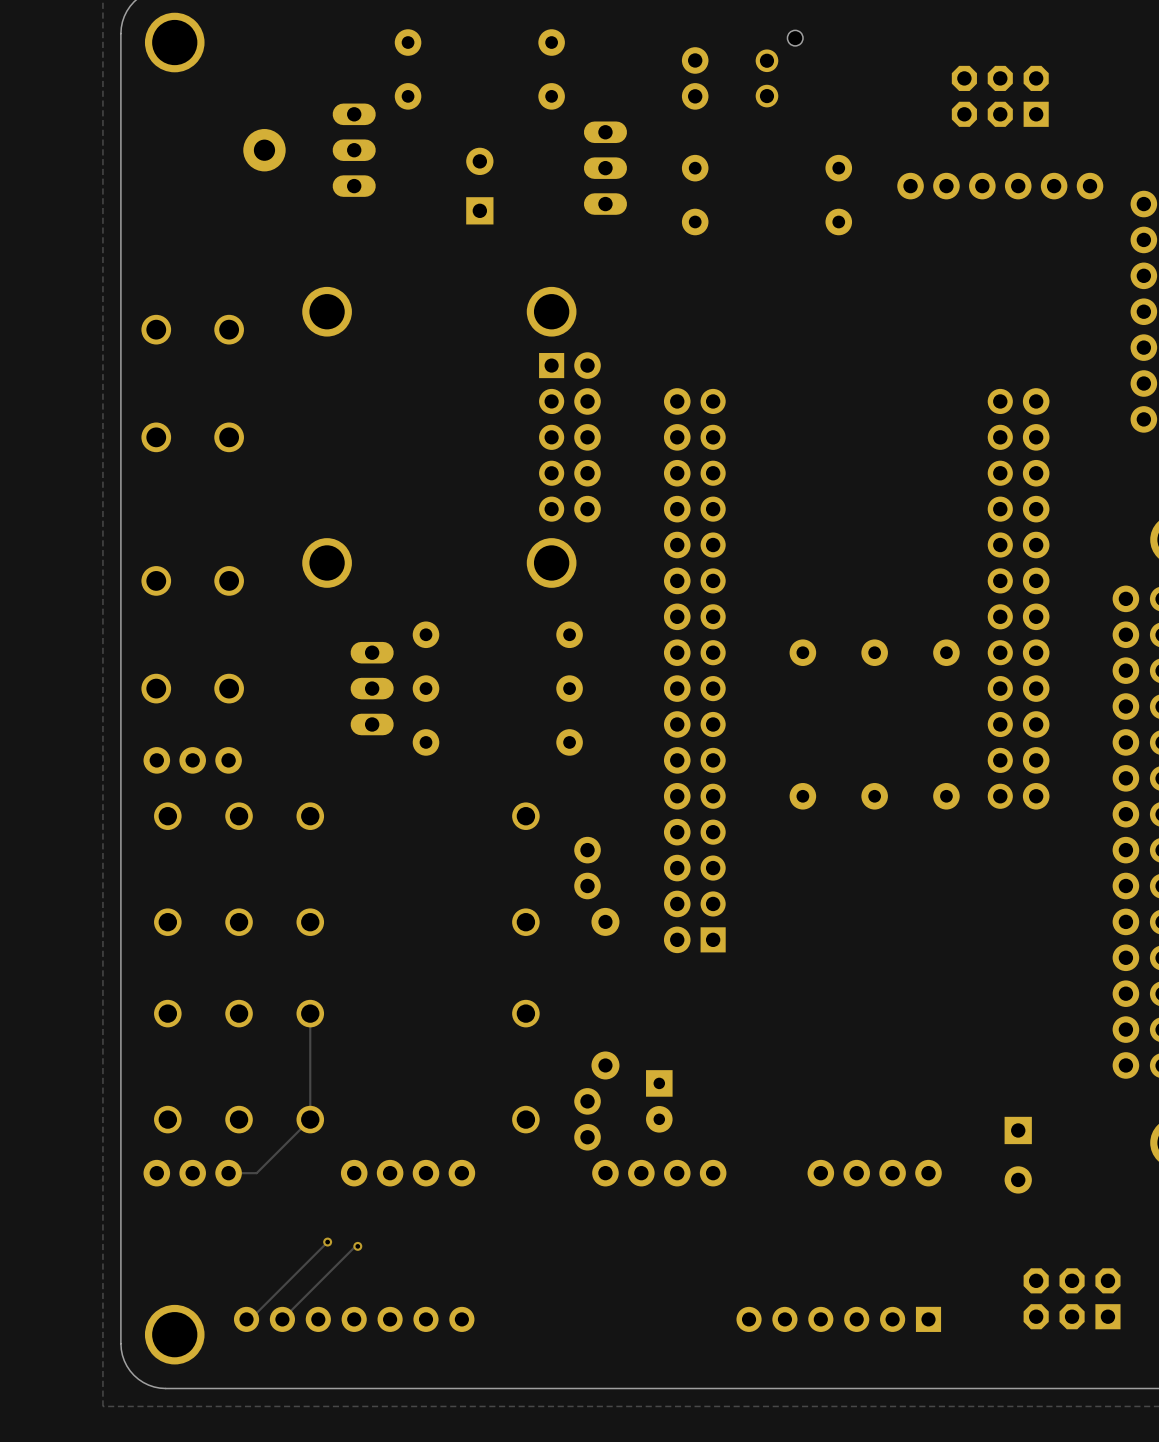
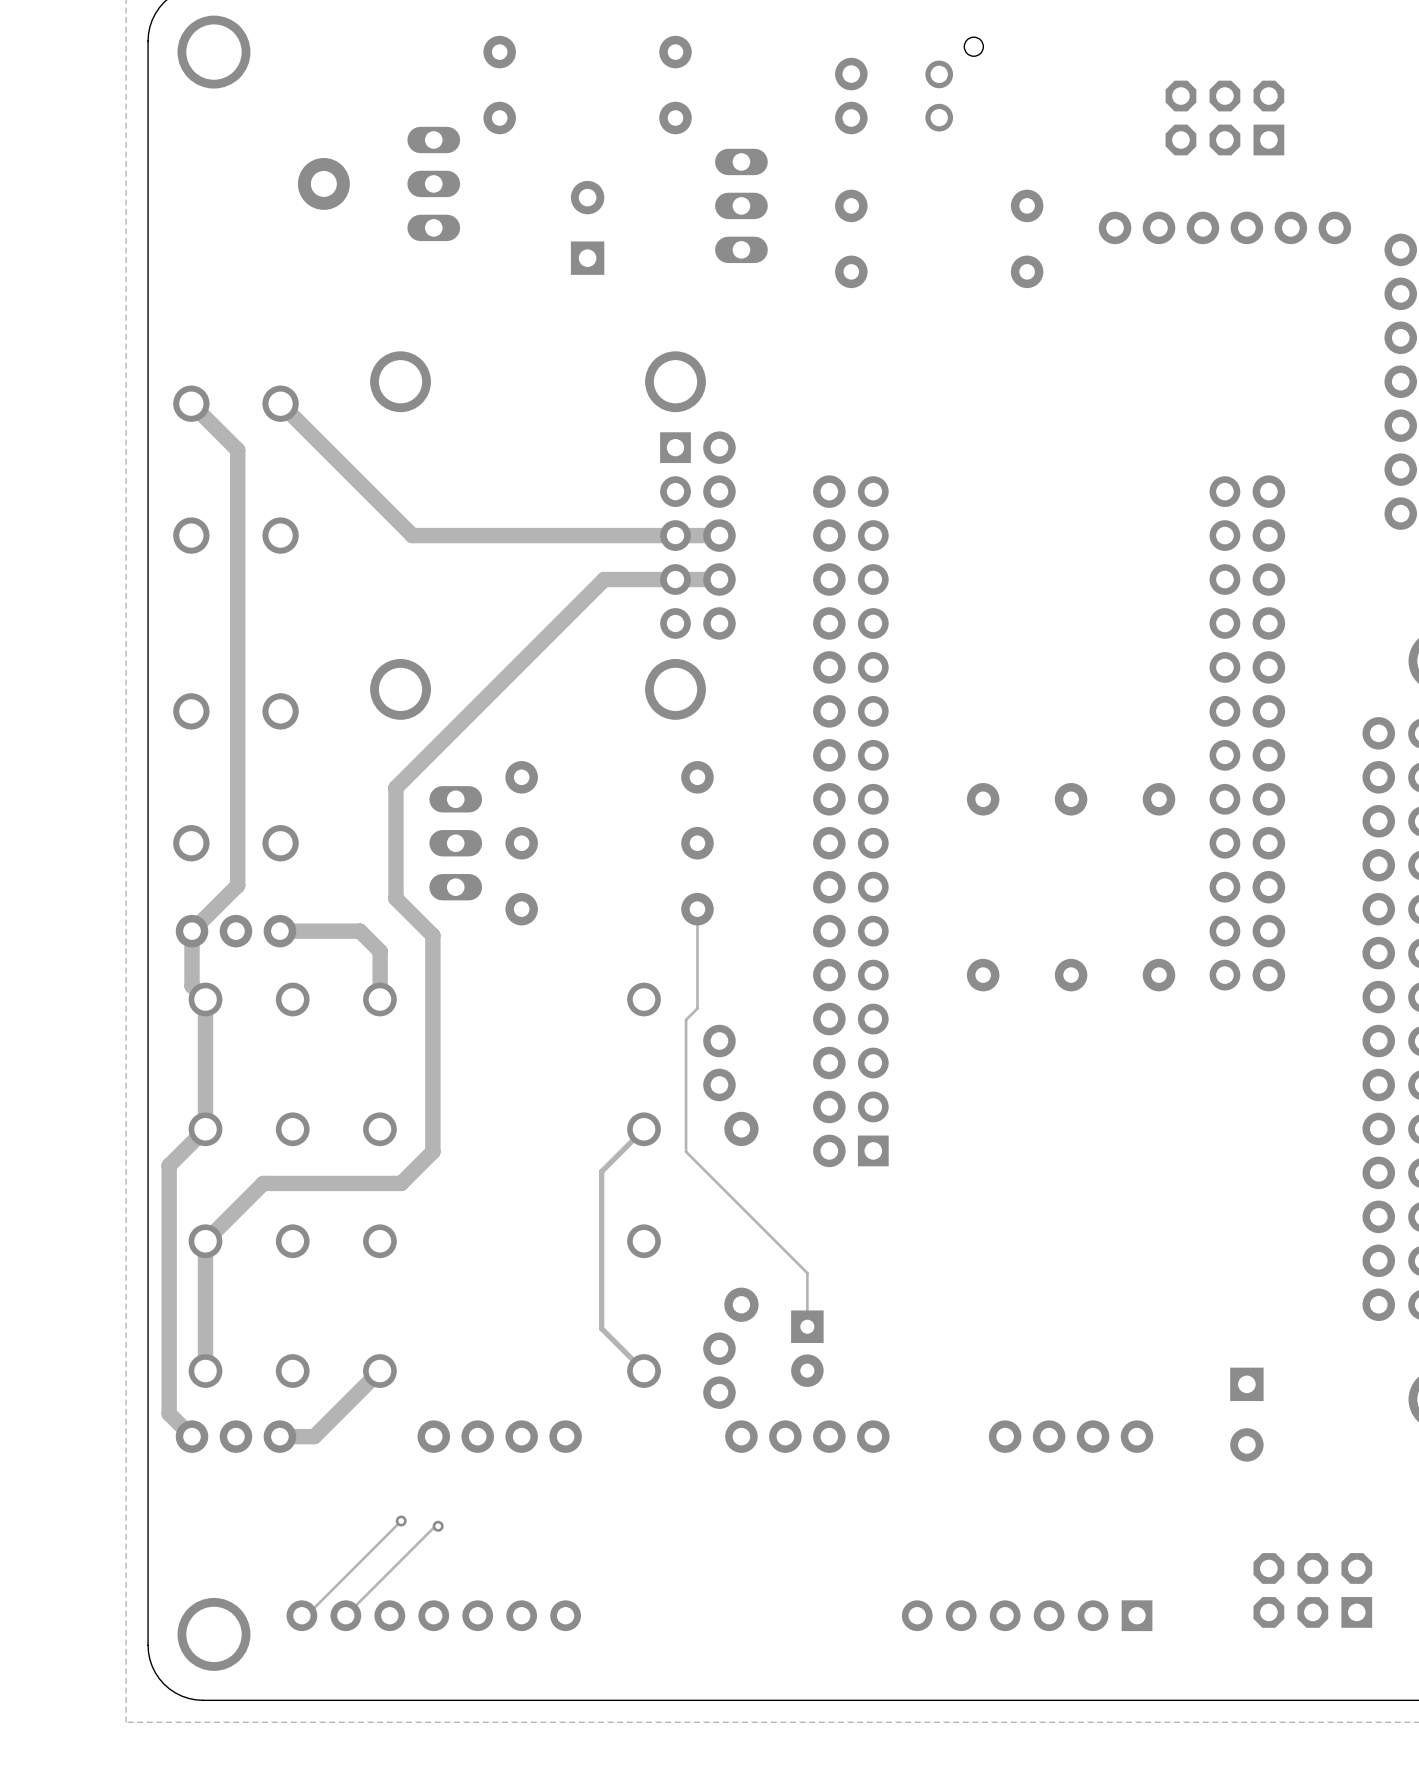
track: none -> (191, 403) (237, 450) (237, 885) (192, 931) (192, 986) (205, 999) (205, 1129) (169, 1165) (169, 1413) (192, 1436)
track: none -> (280, 403) (412, 535) (719, 535)
track: none -> (719, 579) (604, 579) (395, 787) (395, 898) (432, 935) (432, 1151) (401, 1183) (263, 1183) (205, 1241) (205, 1371)
track: none -> (697, 909) (697, 1008) (686, 1019) (686, 1151) (807, 1273) (807, 1326)
track: none -> (279, 931) (359, 931) (380, 951) (380, 999)
track: none -> (644, 1129) (601, 1171) (601, 1328) (644, 1371)
track: (310, 1013) (310, 1119) -> none
track width: thin (310, 1119) (256, 1173) (228, 1173) -> thick (379, 1371) (314, 1436) (279, 1436)

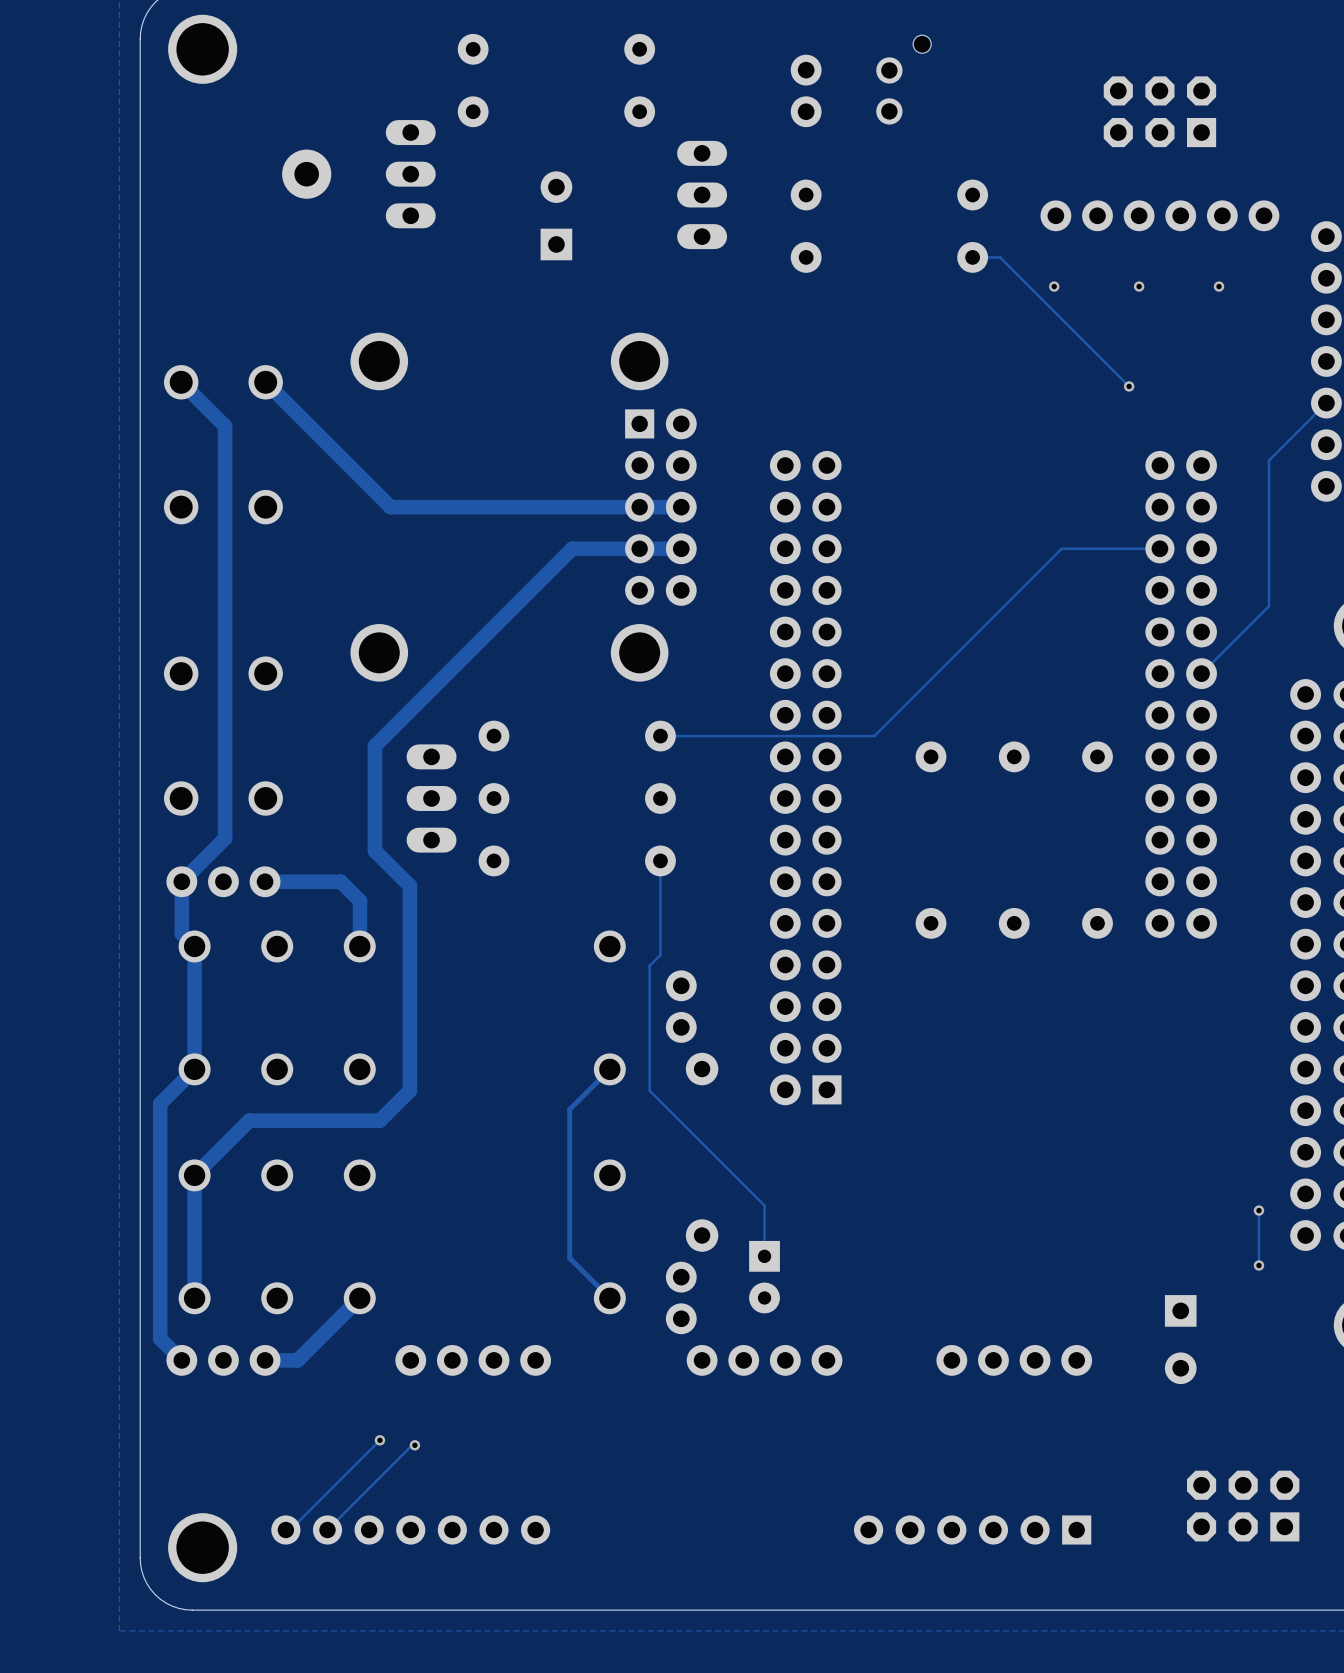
track: none -> (972, 257) (1000, 257) (1129, 386)
via: none -> (1054, 286)
via: none -> (1139, 286)
via: none -> (1219, 286)
via: none -> (1129, 386)
track: none -> (1326, 403) (1268, 460) (1268, 606) (1201, 673)
track: none -> (1159, 548) (1061, 548) (874, 736) (660, 736)
track: none -> (1258, 1210) (1258, 1265)
via: none -> (1258, 1210)
via: none -> (1258, 1265)

